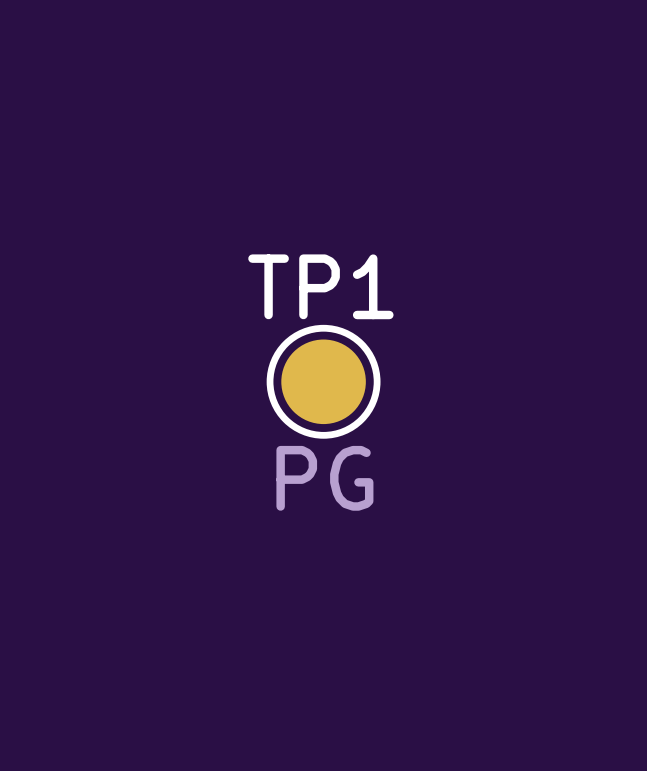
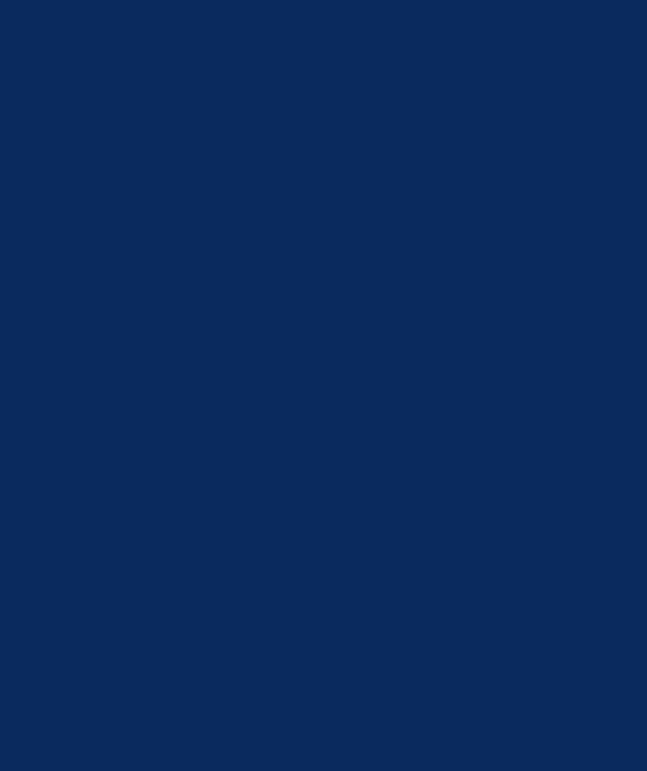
TP1: PG (323, 381) -> none

